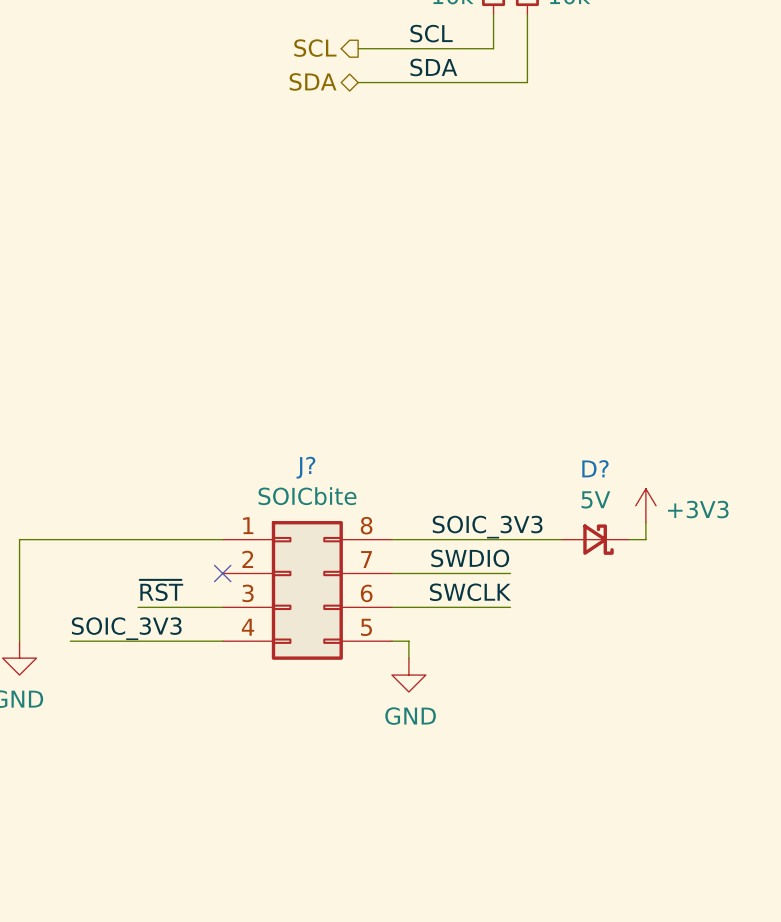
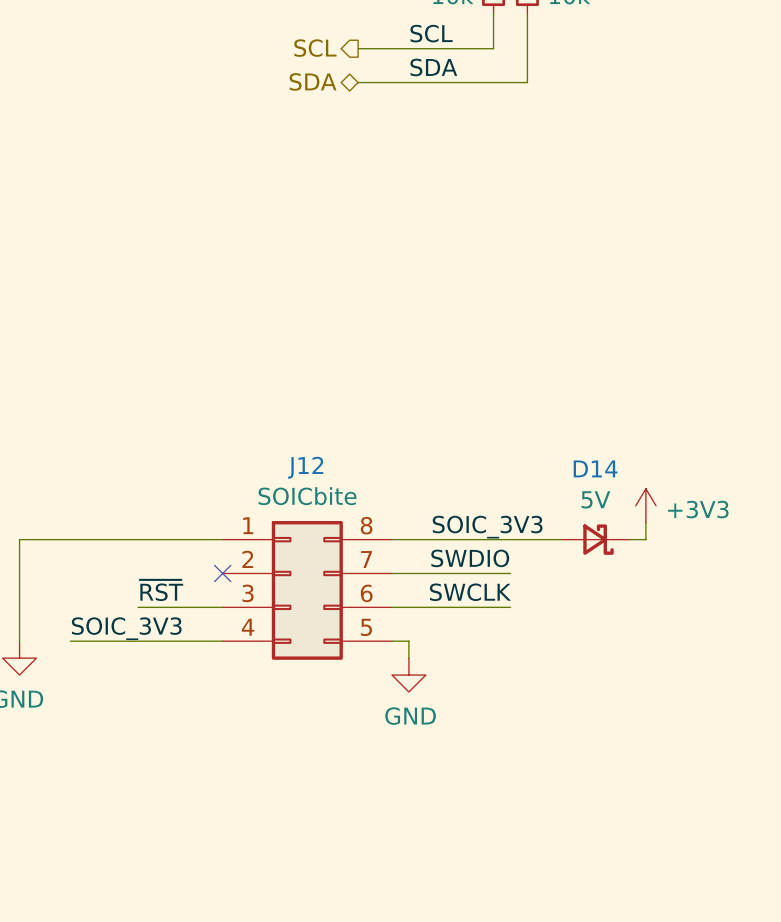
J? name: J? (305, 467) -> J12 (305, 467)
D? name: D? (595, 468) -> D14 (595, 468)

